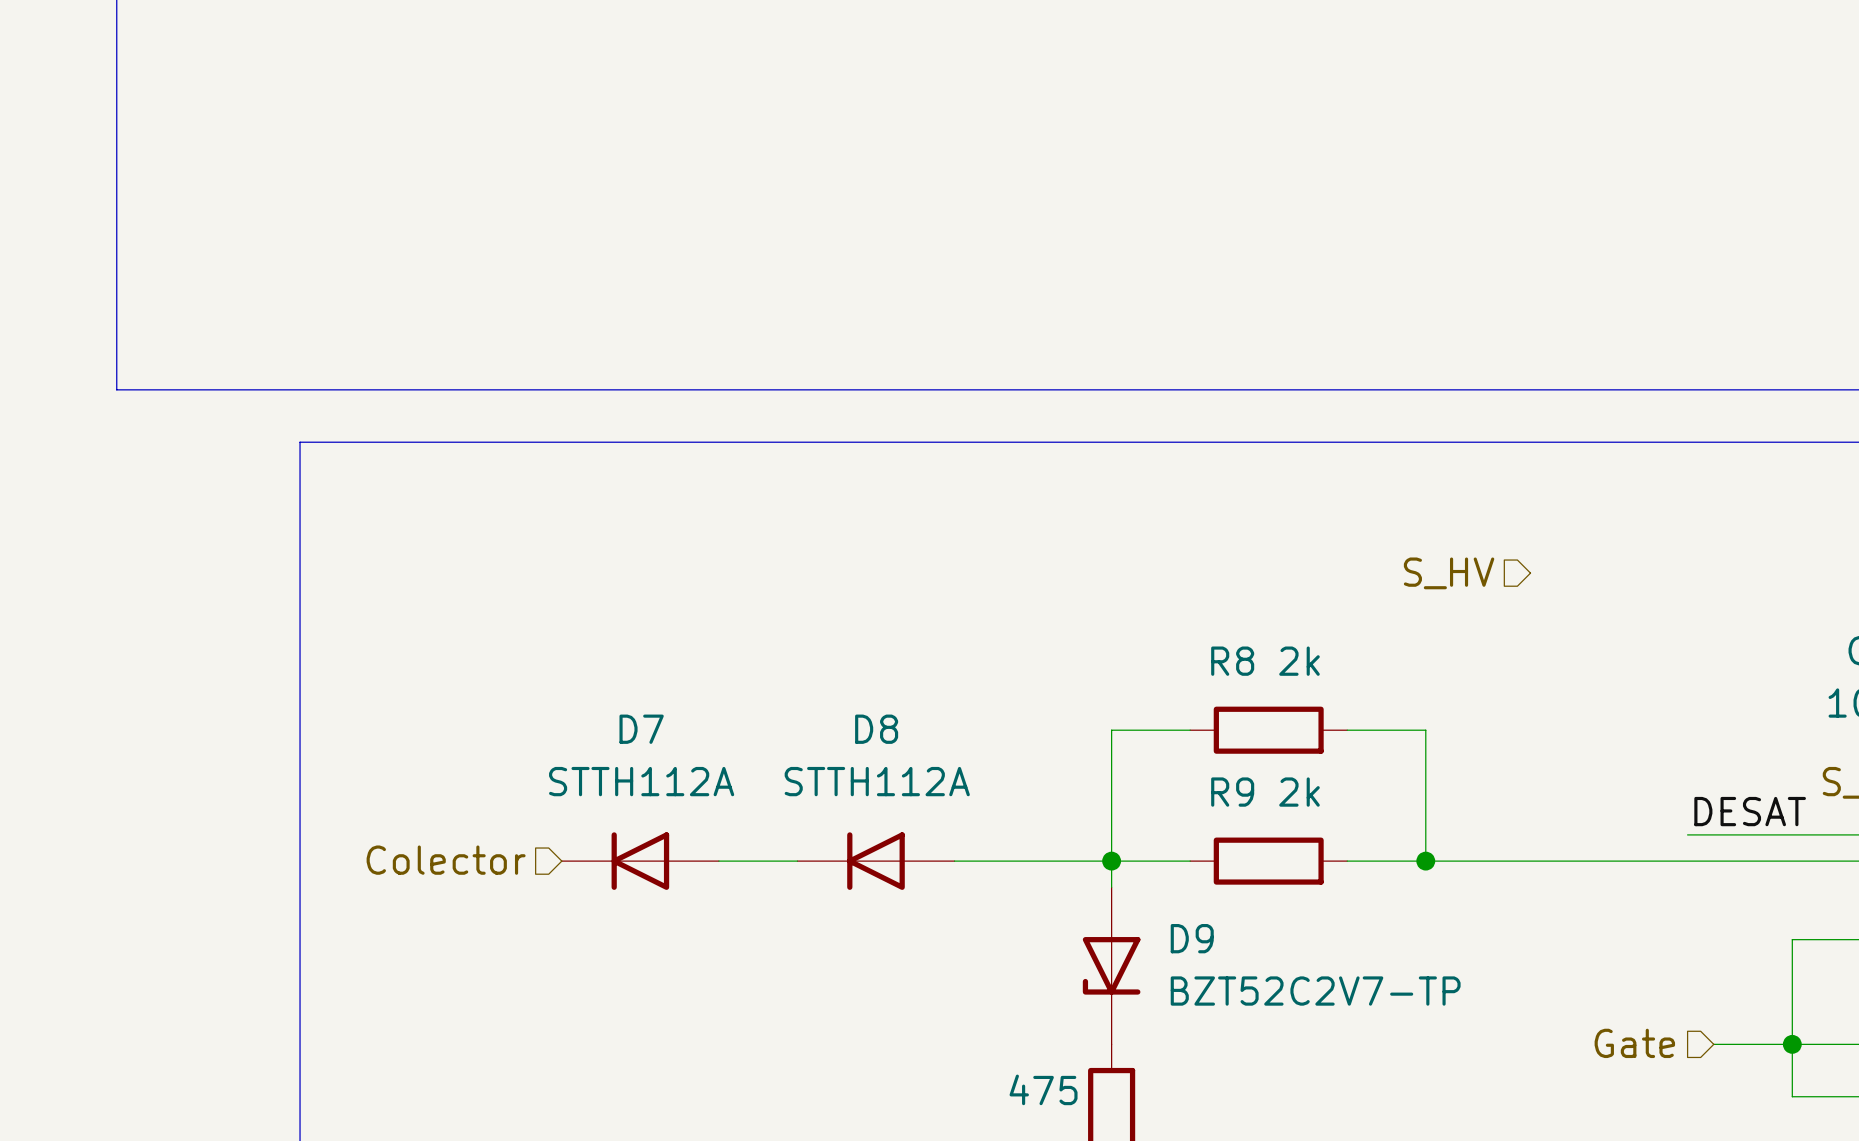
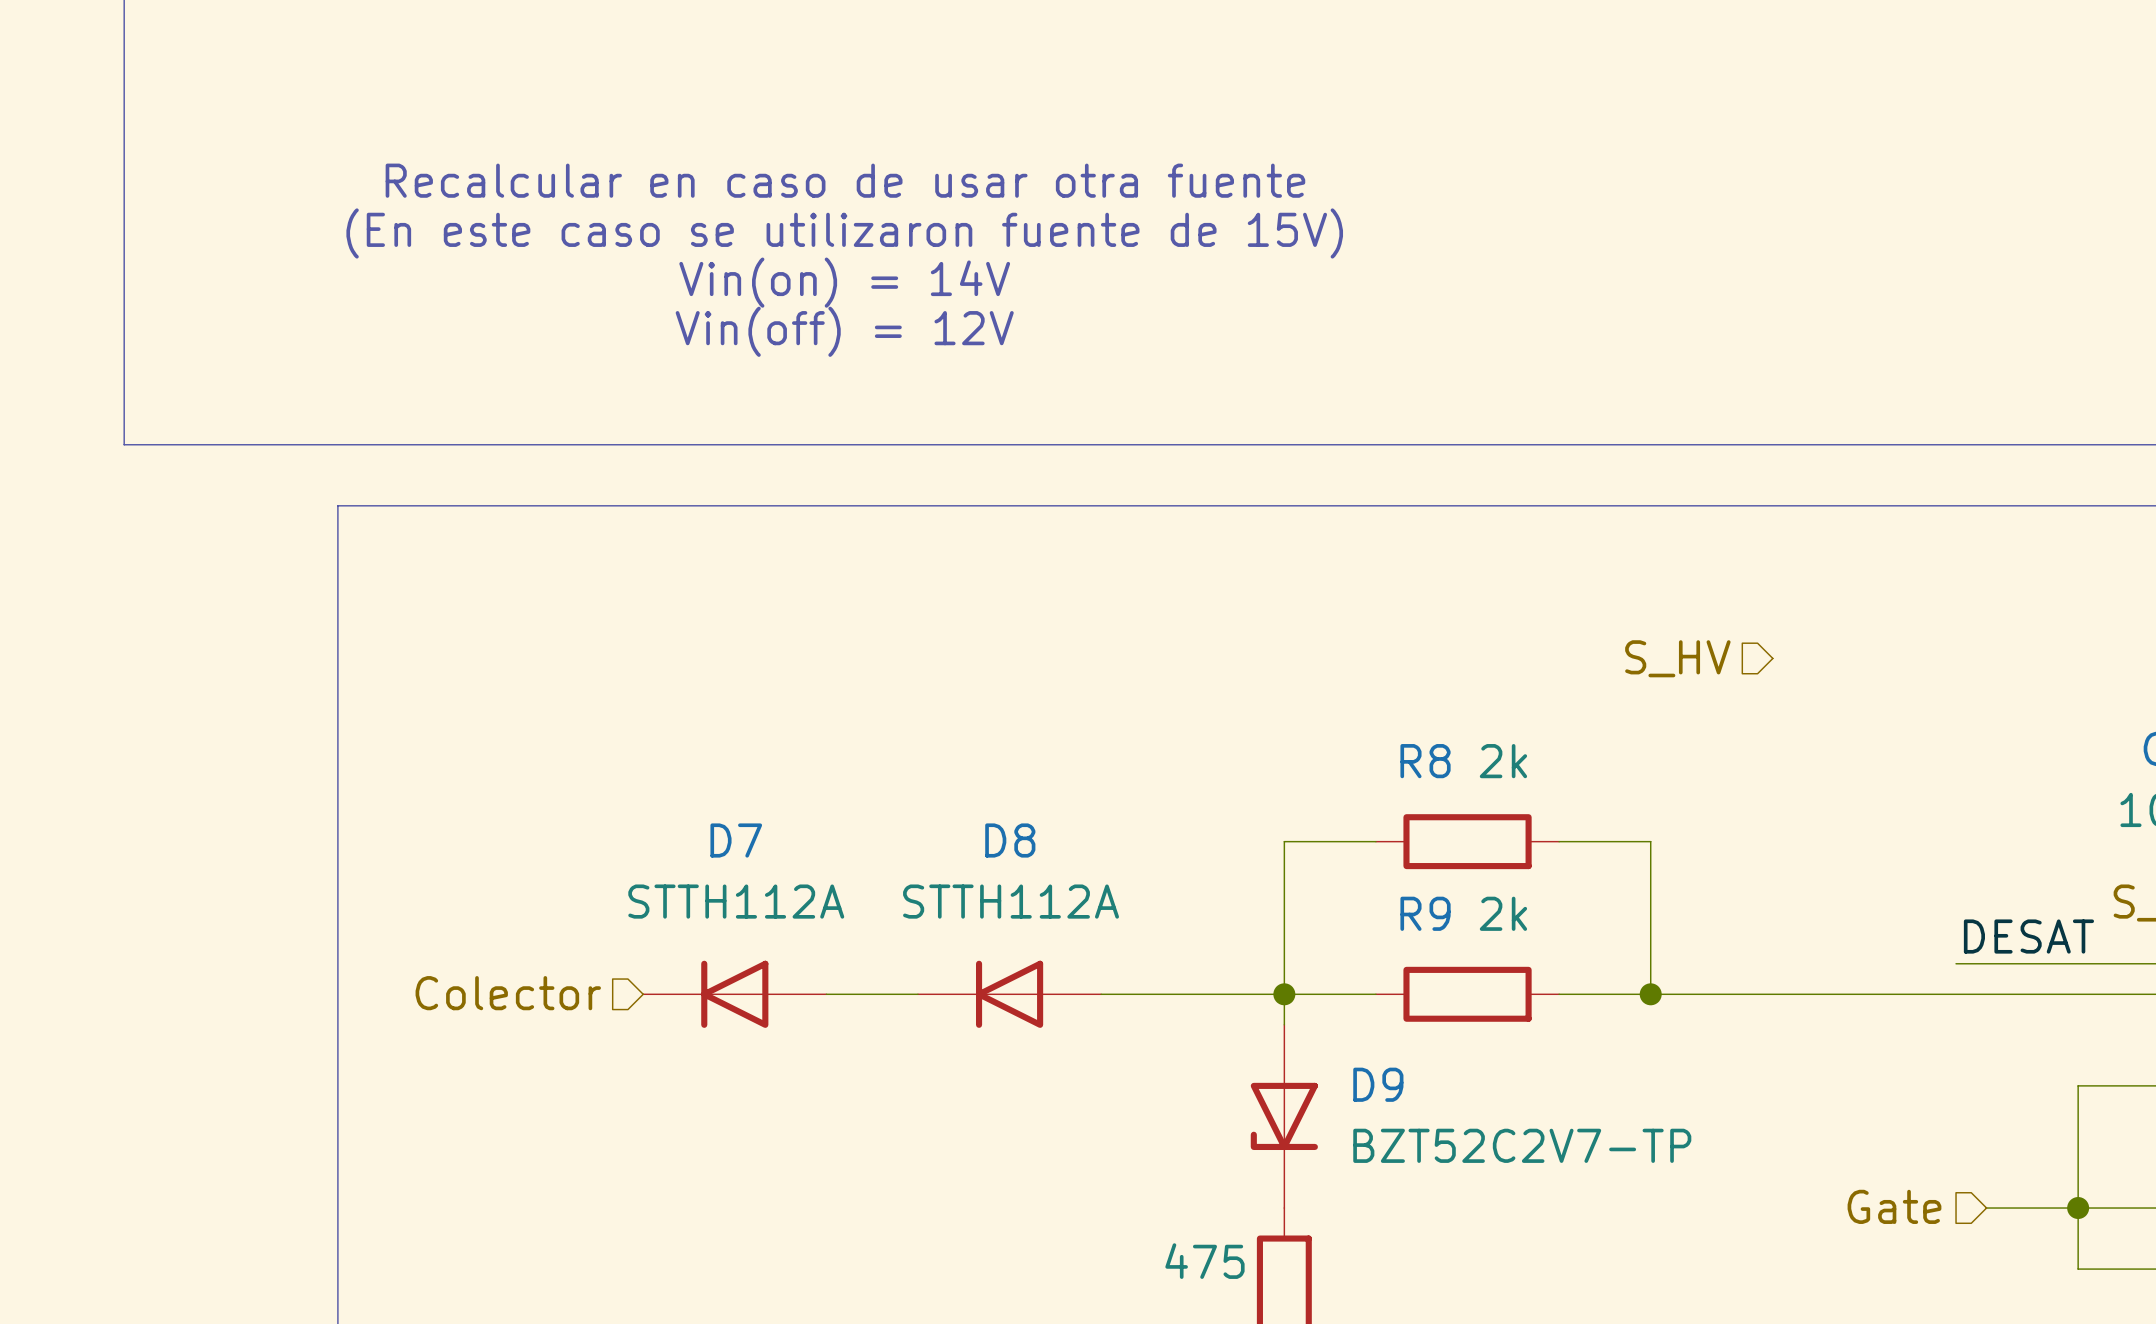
text: none -> Recalcular en caso de usar otra fuente (845, 180)
text: none -> (En este caso se utilizaron fuente de 15V) (844, 233)
text: none -> Vin(on) = 14V (844, 282)
text: none -> Vin(off) = 12V (844, 331)

